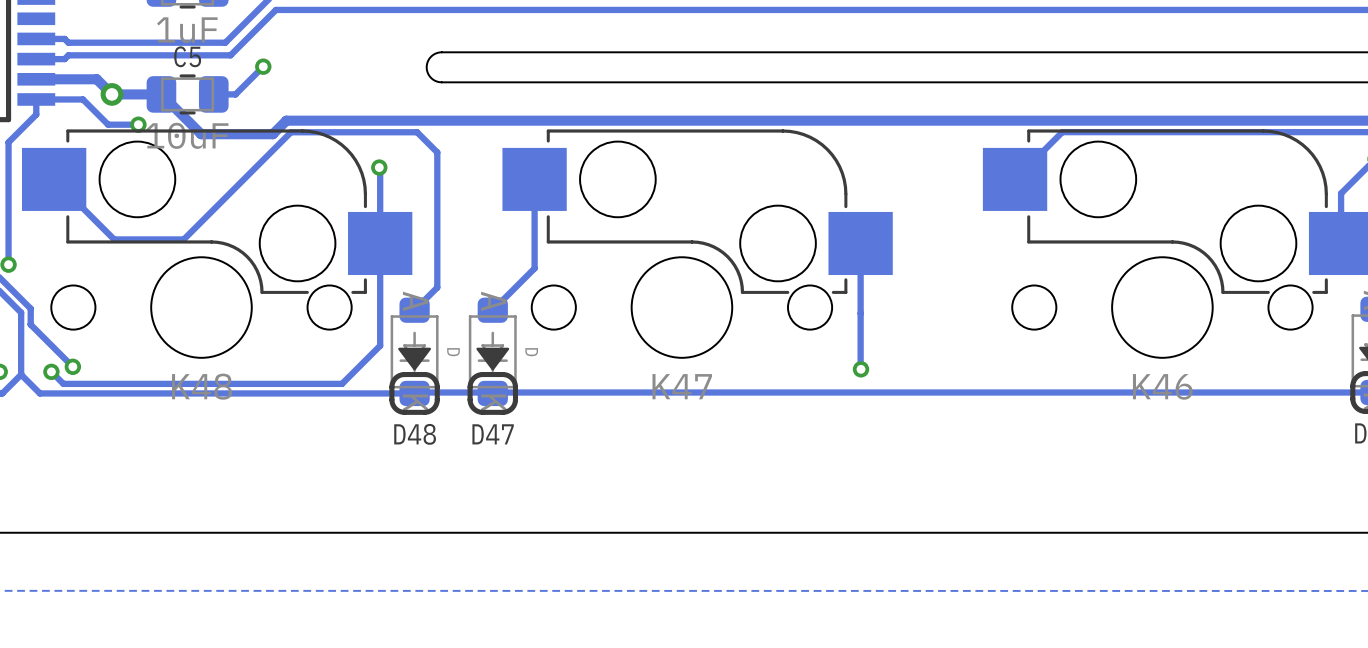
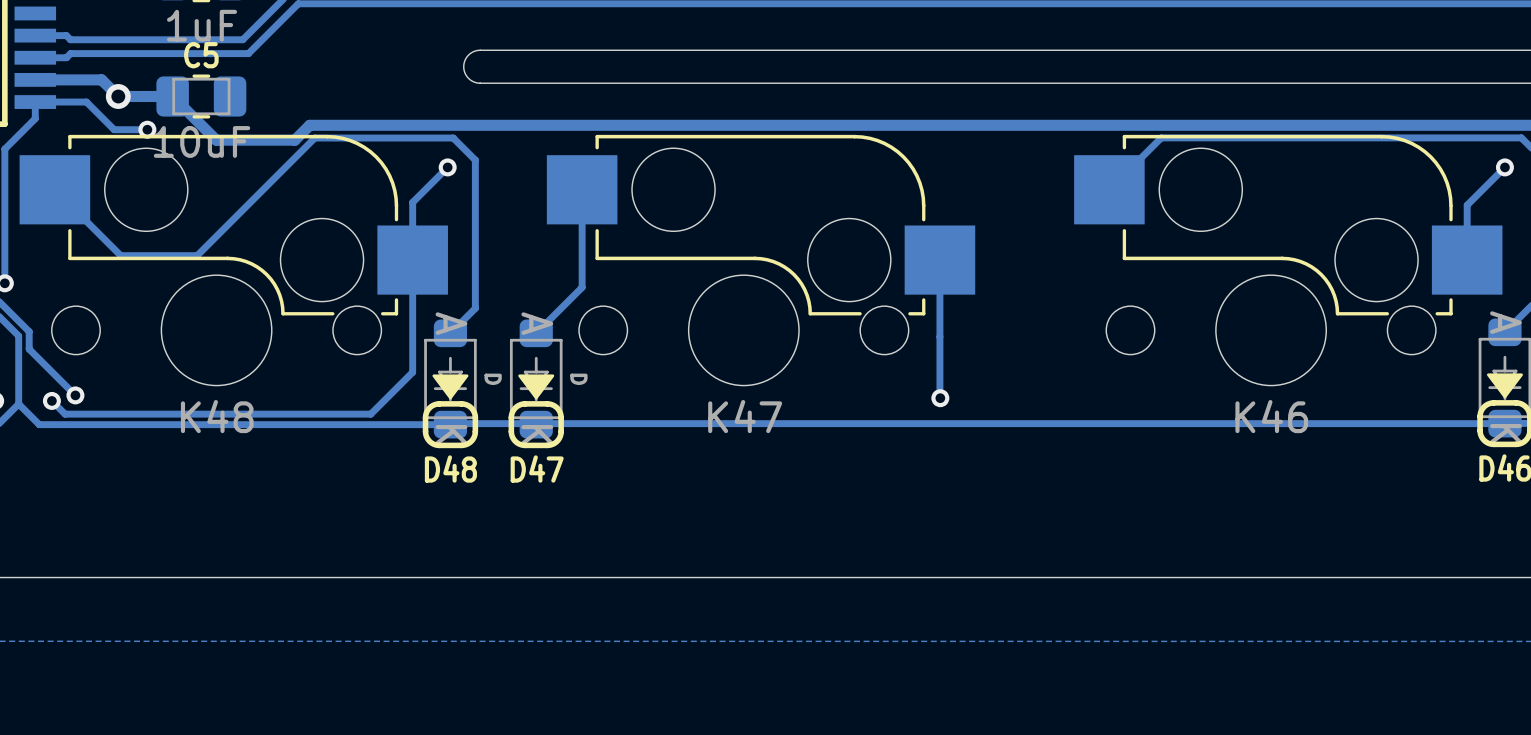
track: (263, 66) (235, 94) (213, 94) -> none
via: (263, 66) -> none
track: (379, 167) (380, 190) -> (447, 167) (412, 202)
via position: (379, 167) -> (447, 167)

